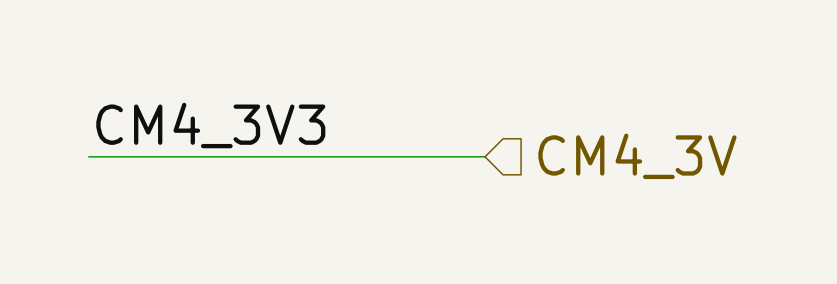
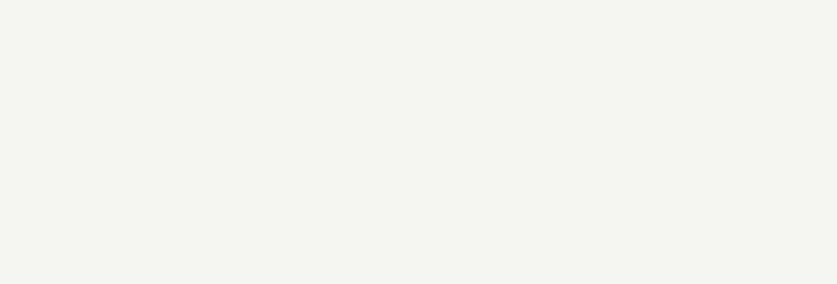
label: CM4_3V3 (210, 125) -> none
wire: (88, 156) (485, 156) -> none
hierarchical label: CM4_3V (637, 156) -> none

